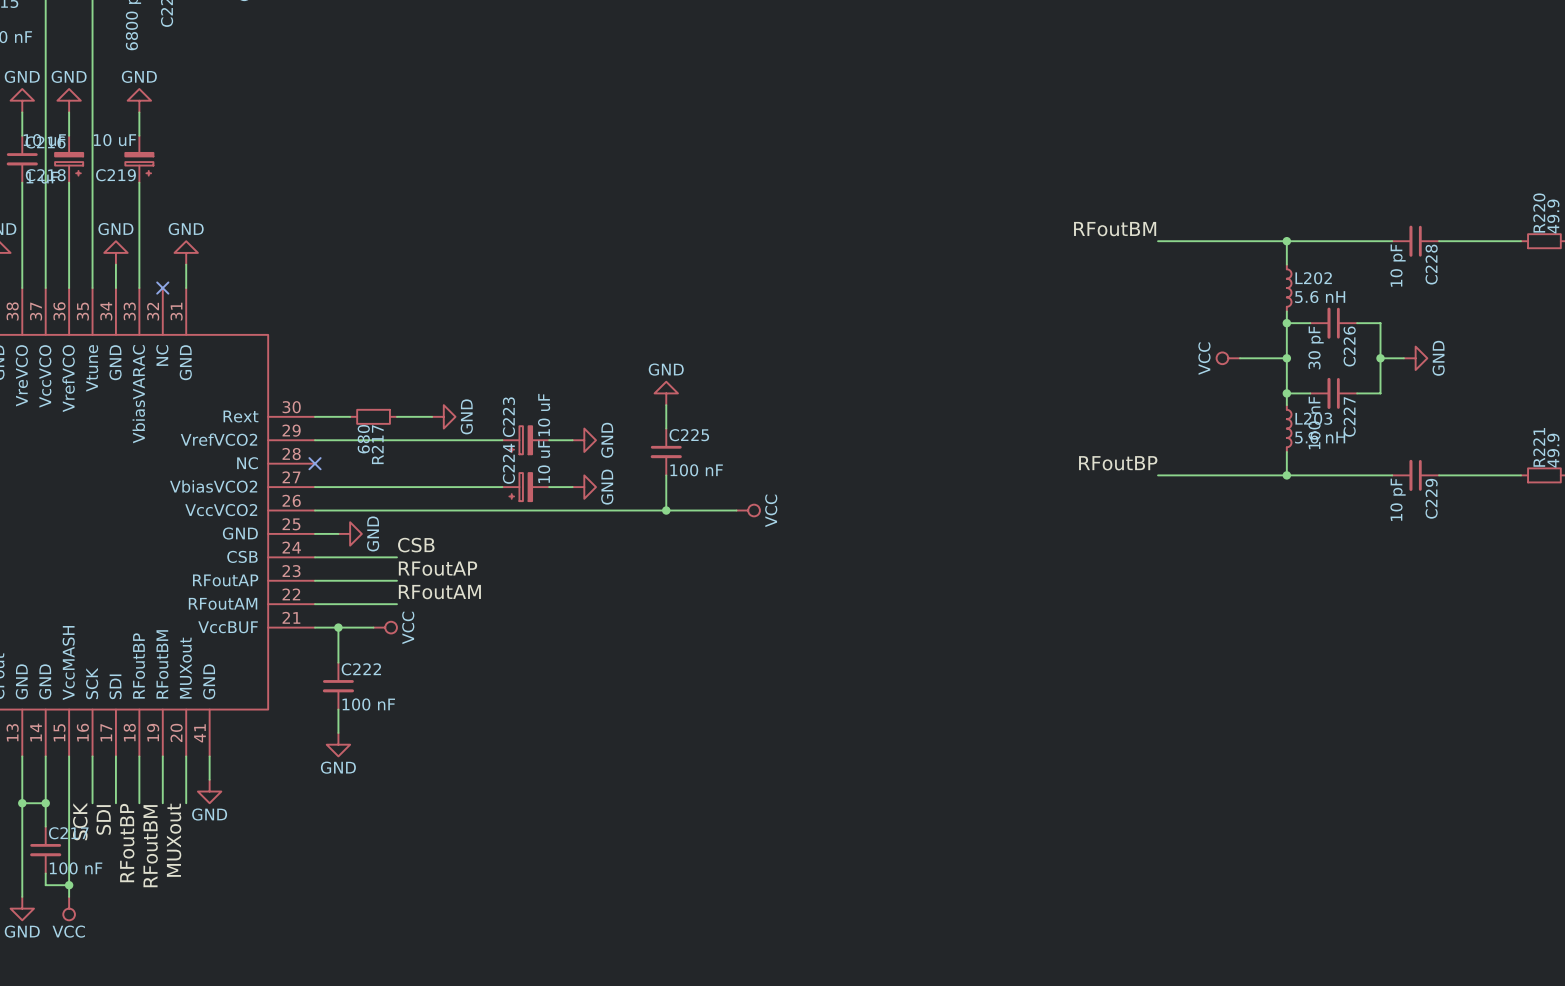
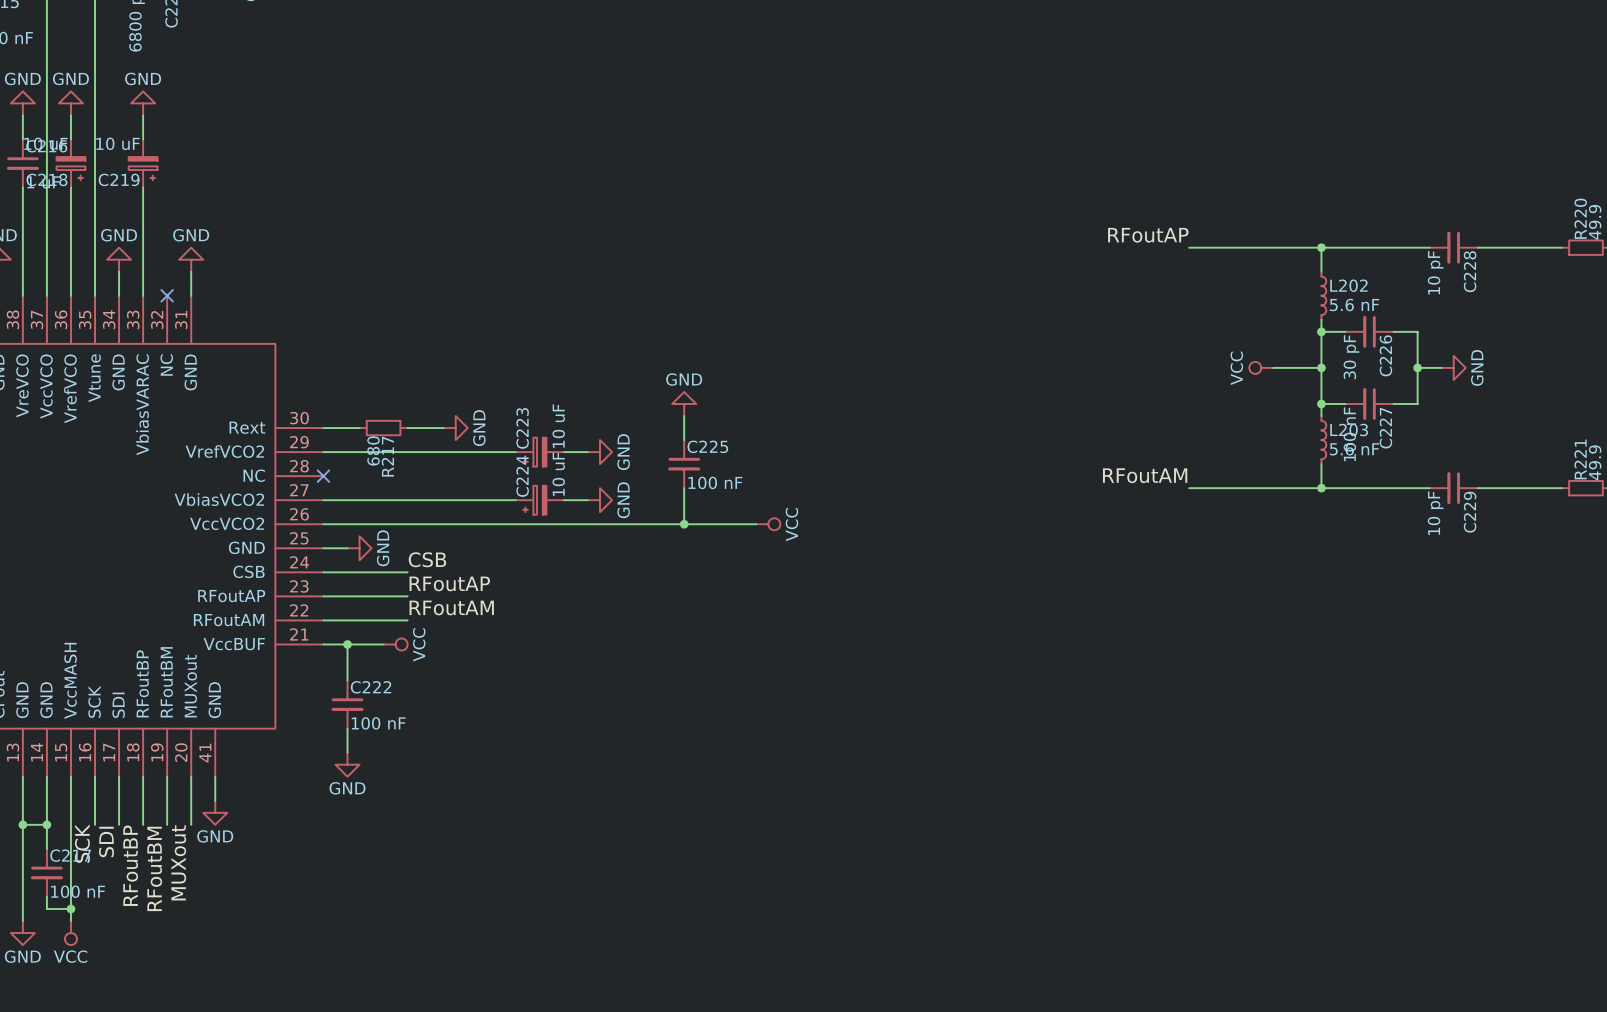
label: RFoutBM (1115, 229) -> RFoutAP (1148, 235)
L202 value: 5.6 nH (1320, 296) -> 5.6 nF (1354, 304)
L203 value: 5.6 nH (1320, 437) -> 5.6 nF (1354, 449)
label: RFoutBP (1118, 463) -> RFoutAM (1145, 475)

